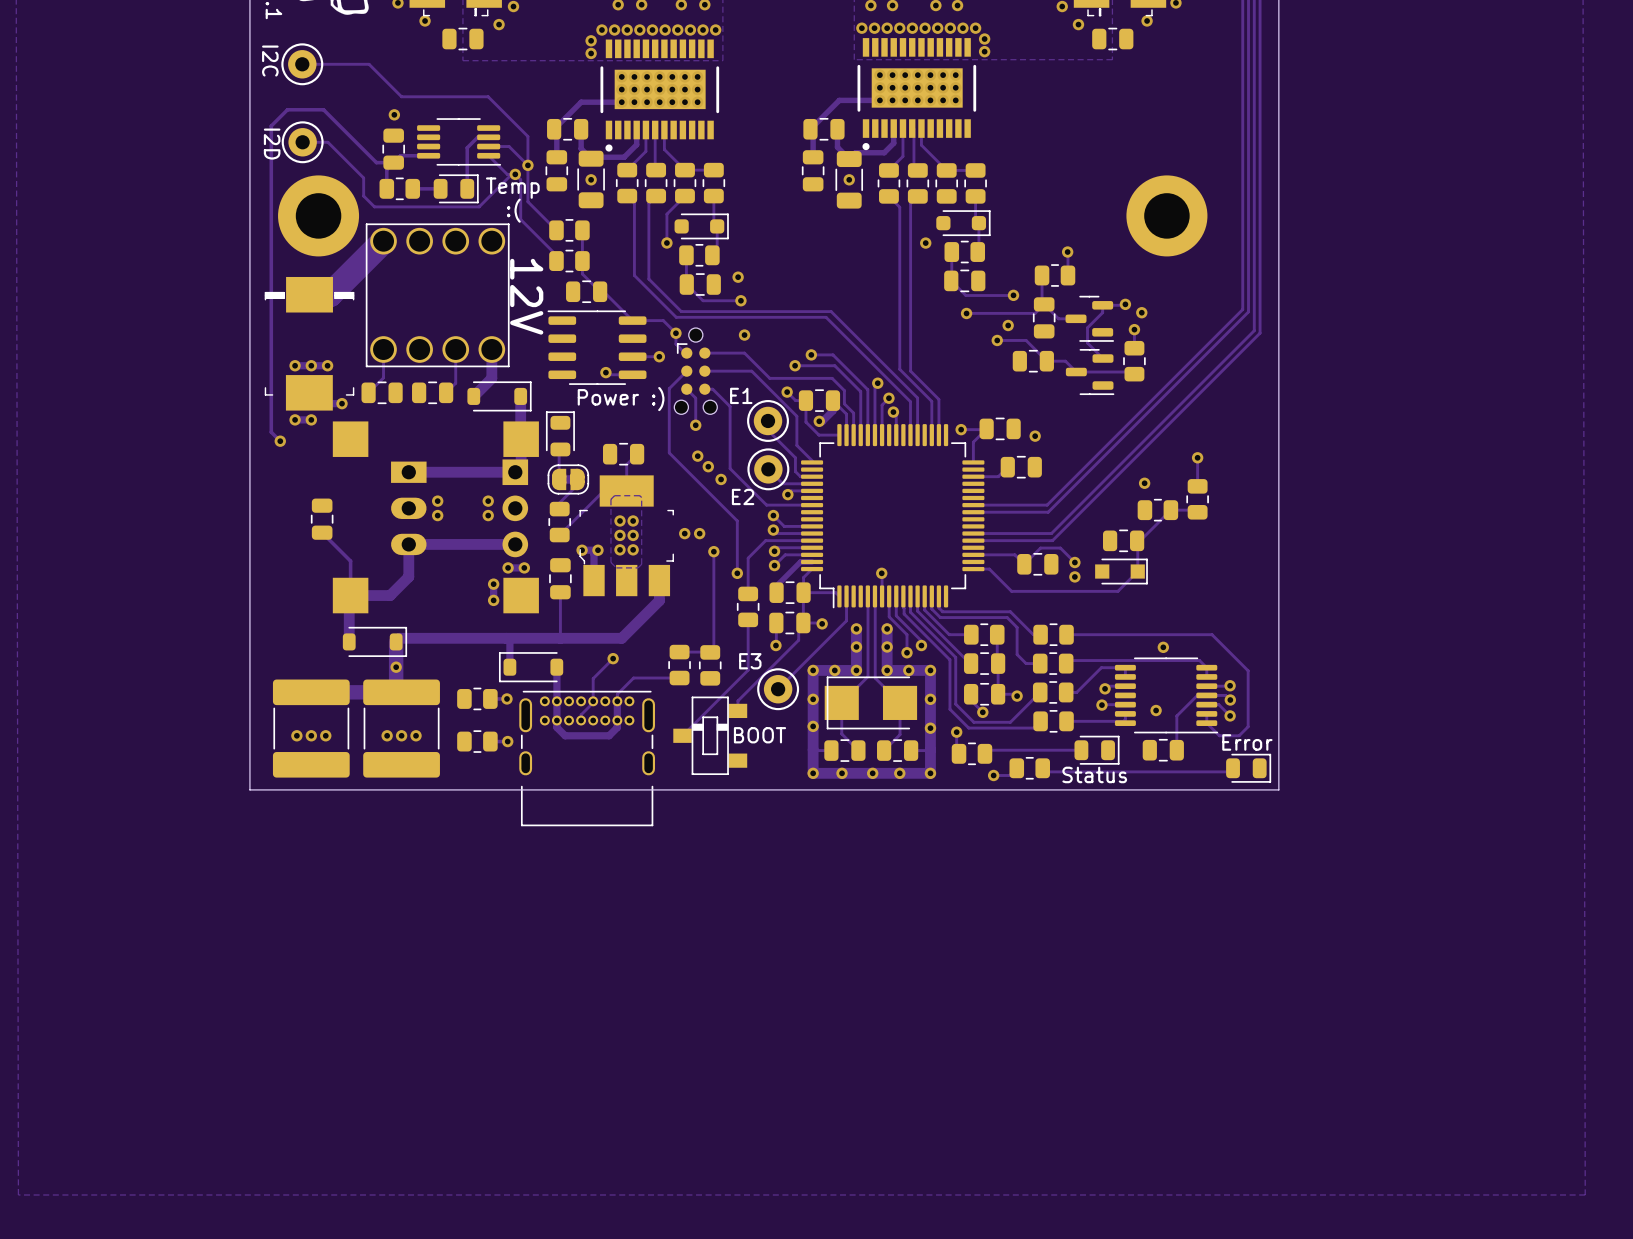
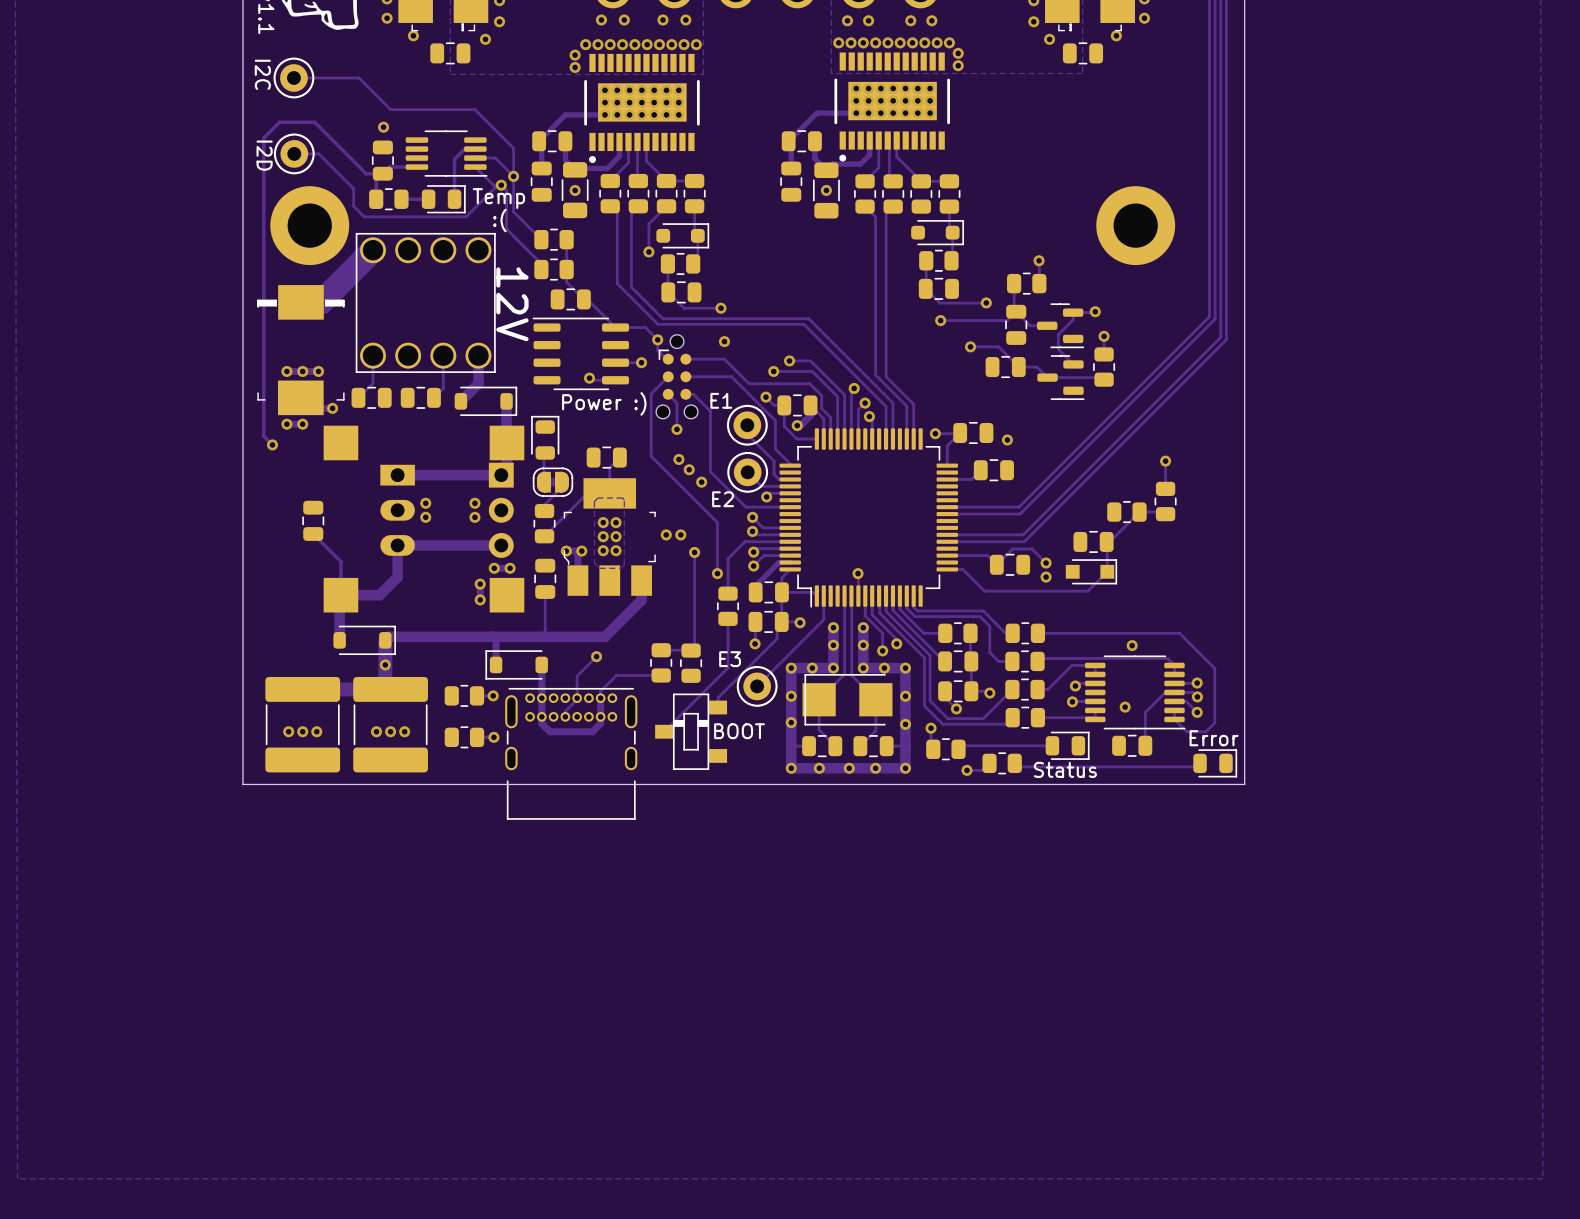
via: (925, 243) -> none
via: (738, 277) -> none
via: (1141, 312) -> none
via: (1008, 325) -> none
via: (1144, 483) -> none

